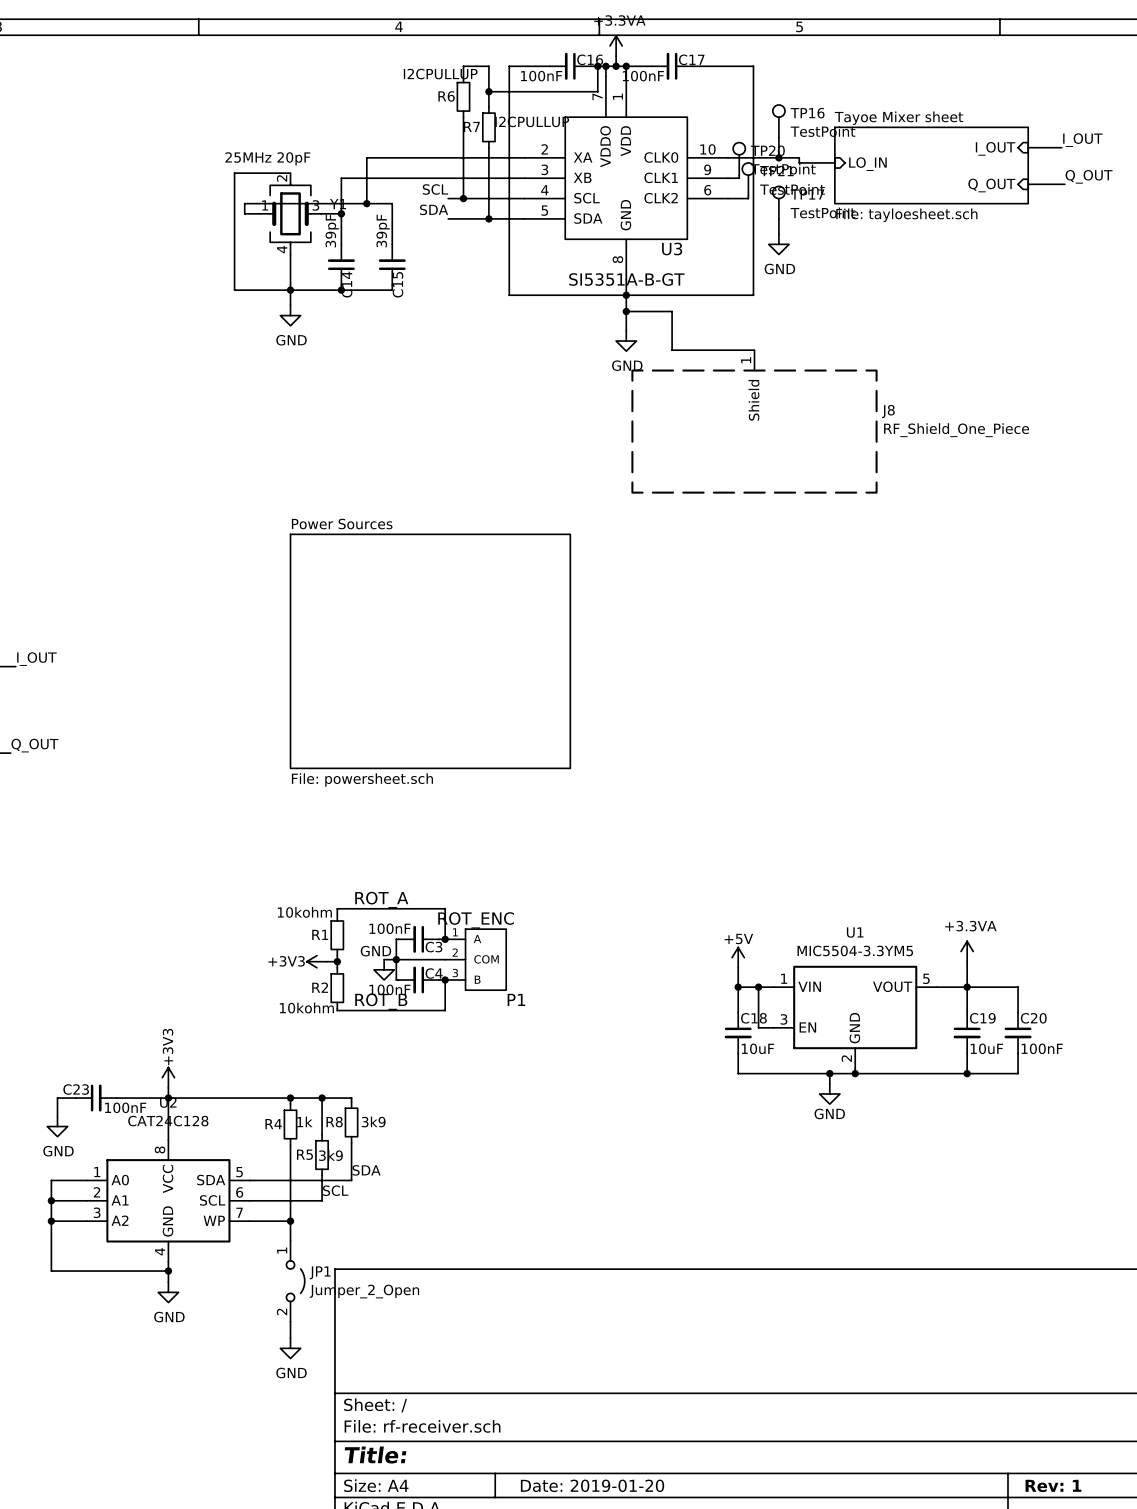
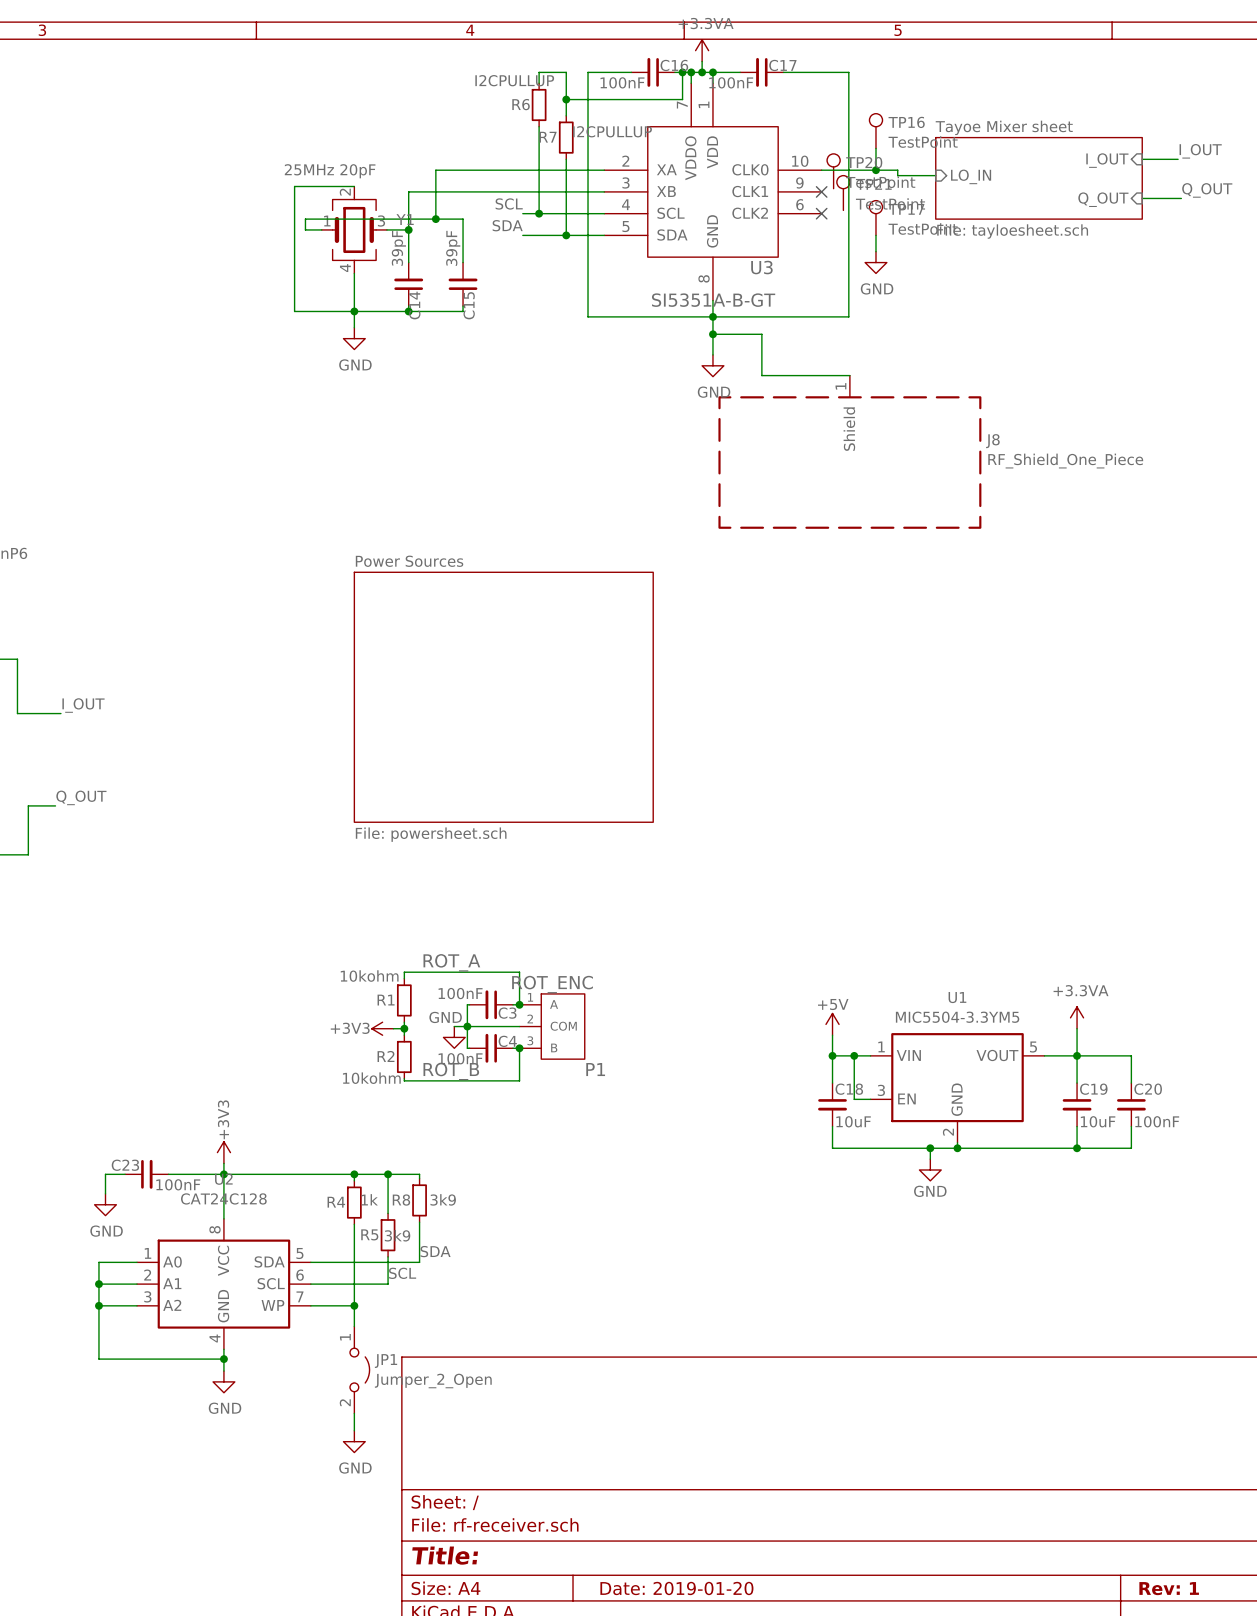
wire: (739, 175) (739, 178) (728, 178) -> none
no-connect mark: none -> (821, 191)
wire: (748, 195) (748, 198) (728, 198) -> none
no-connect mark: none -> (821, 213)

